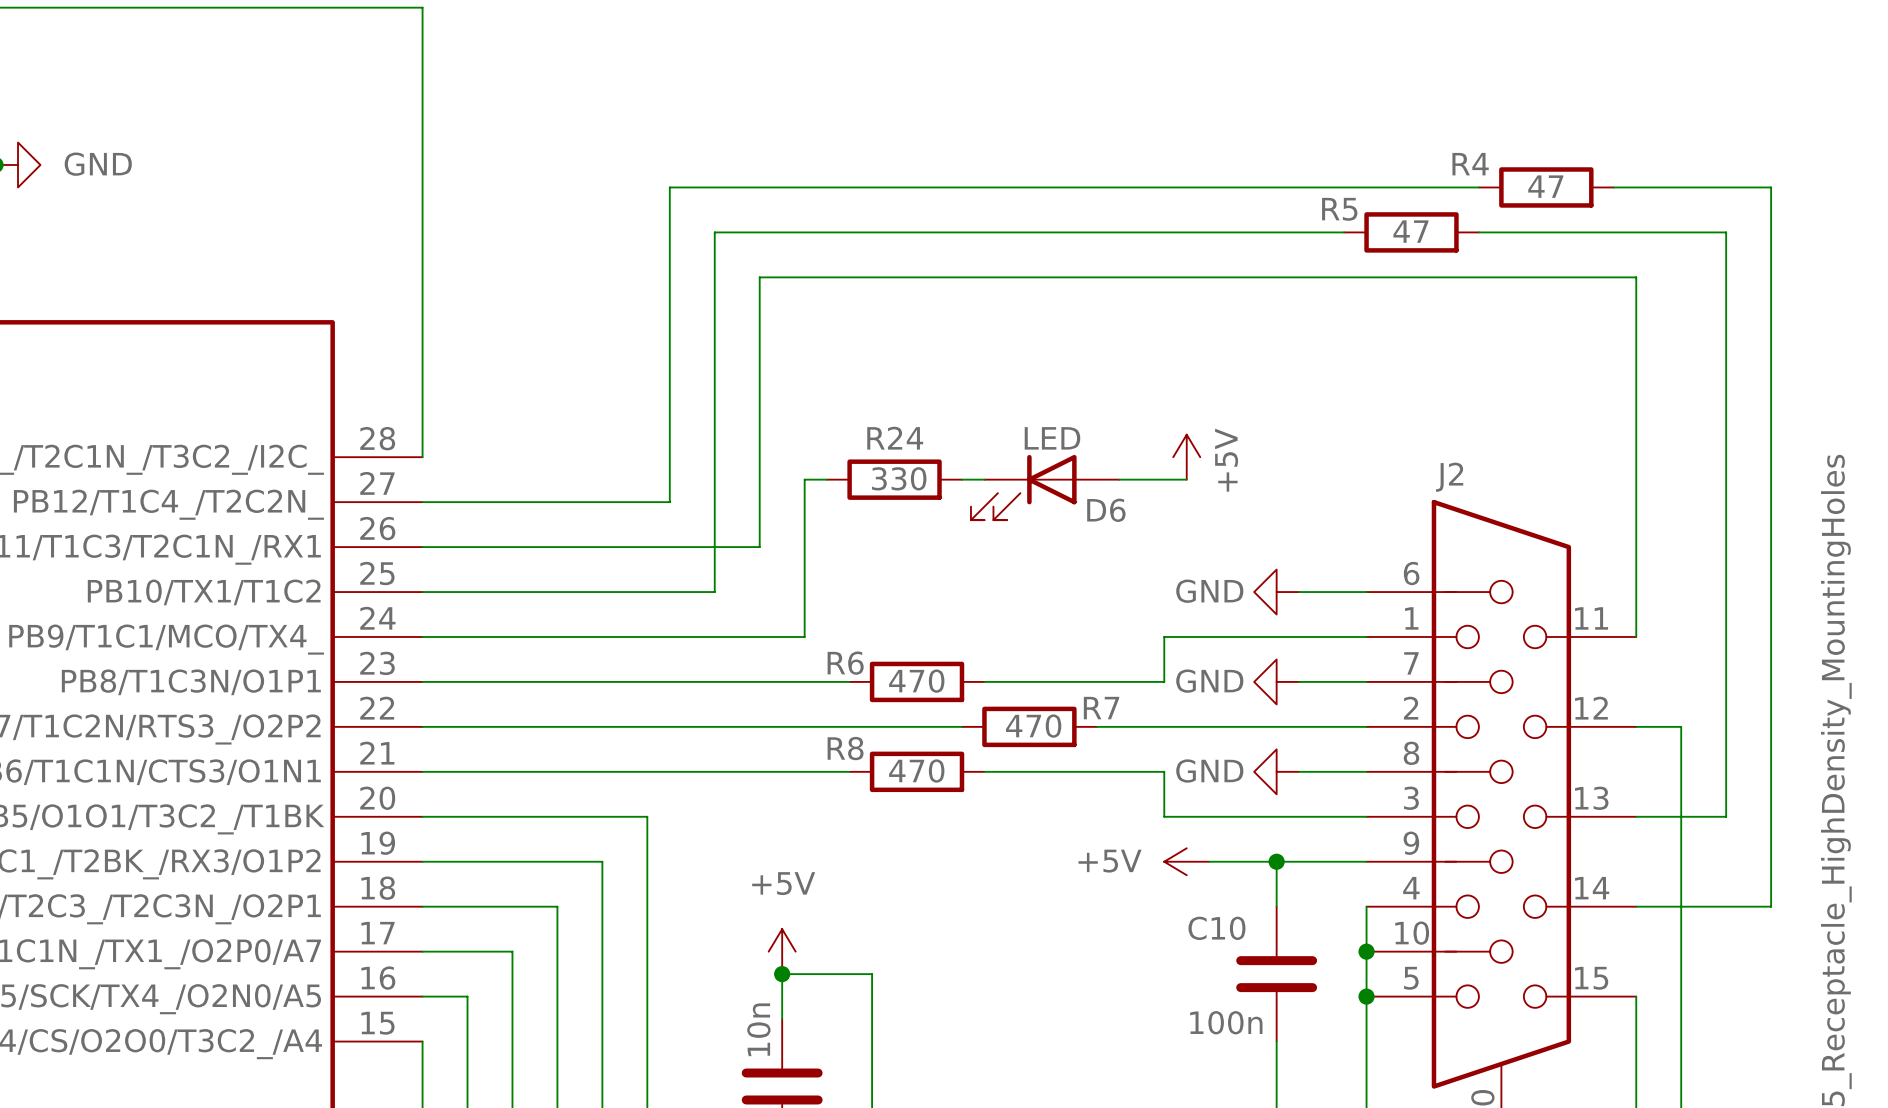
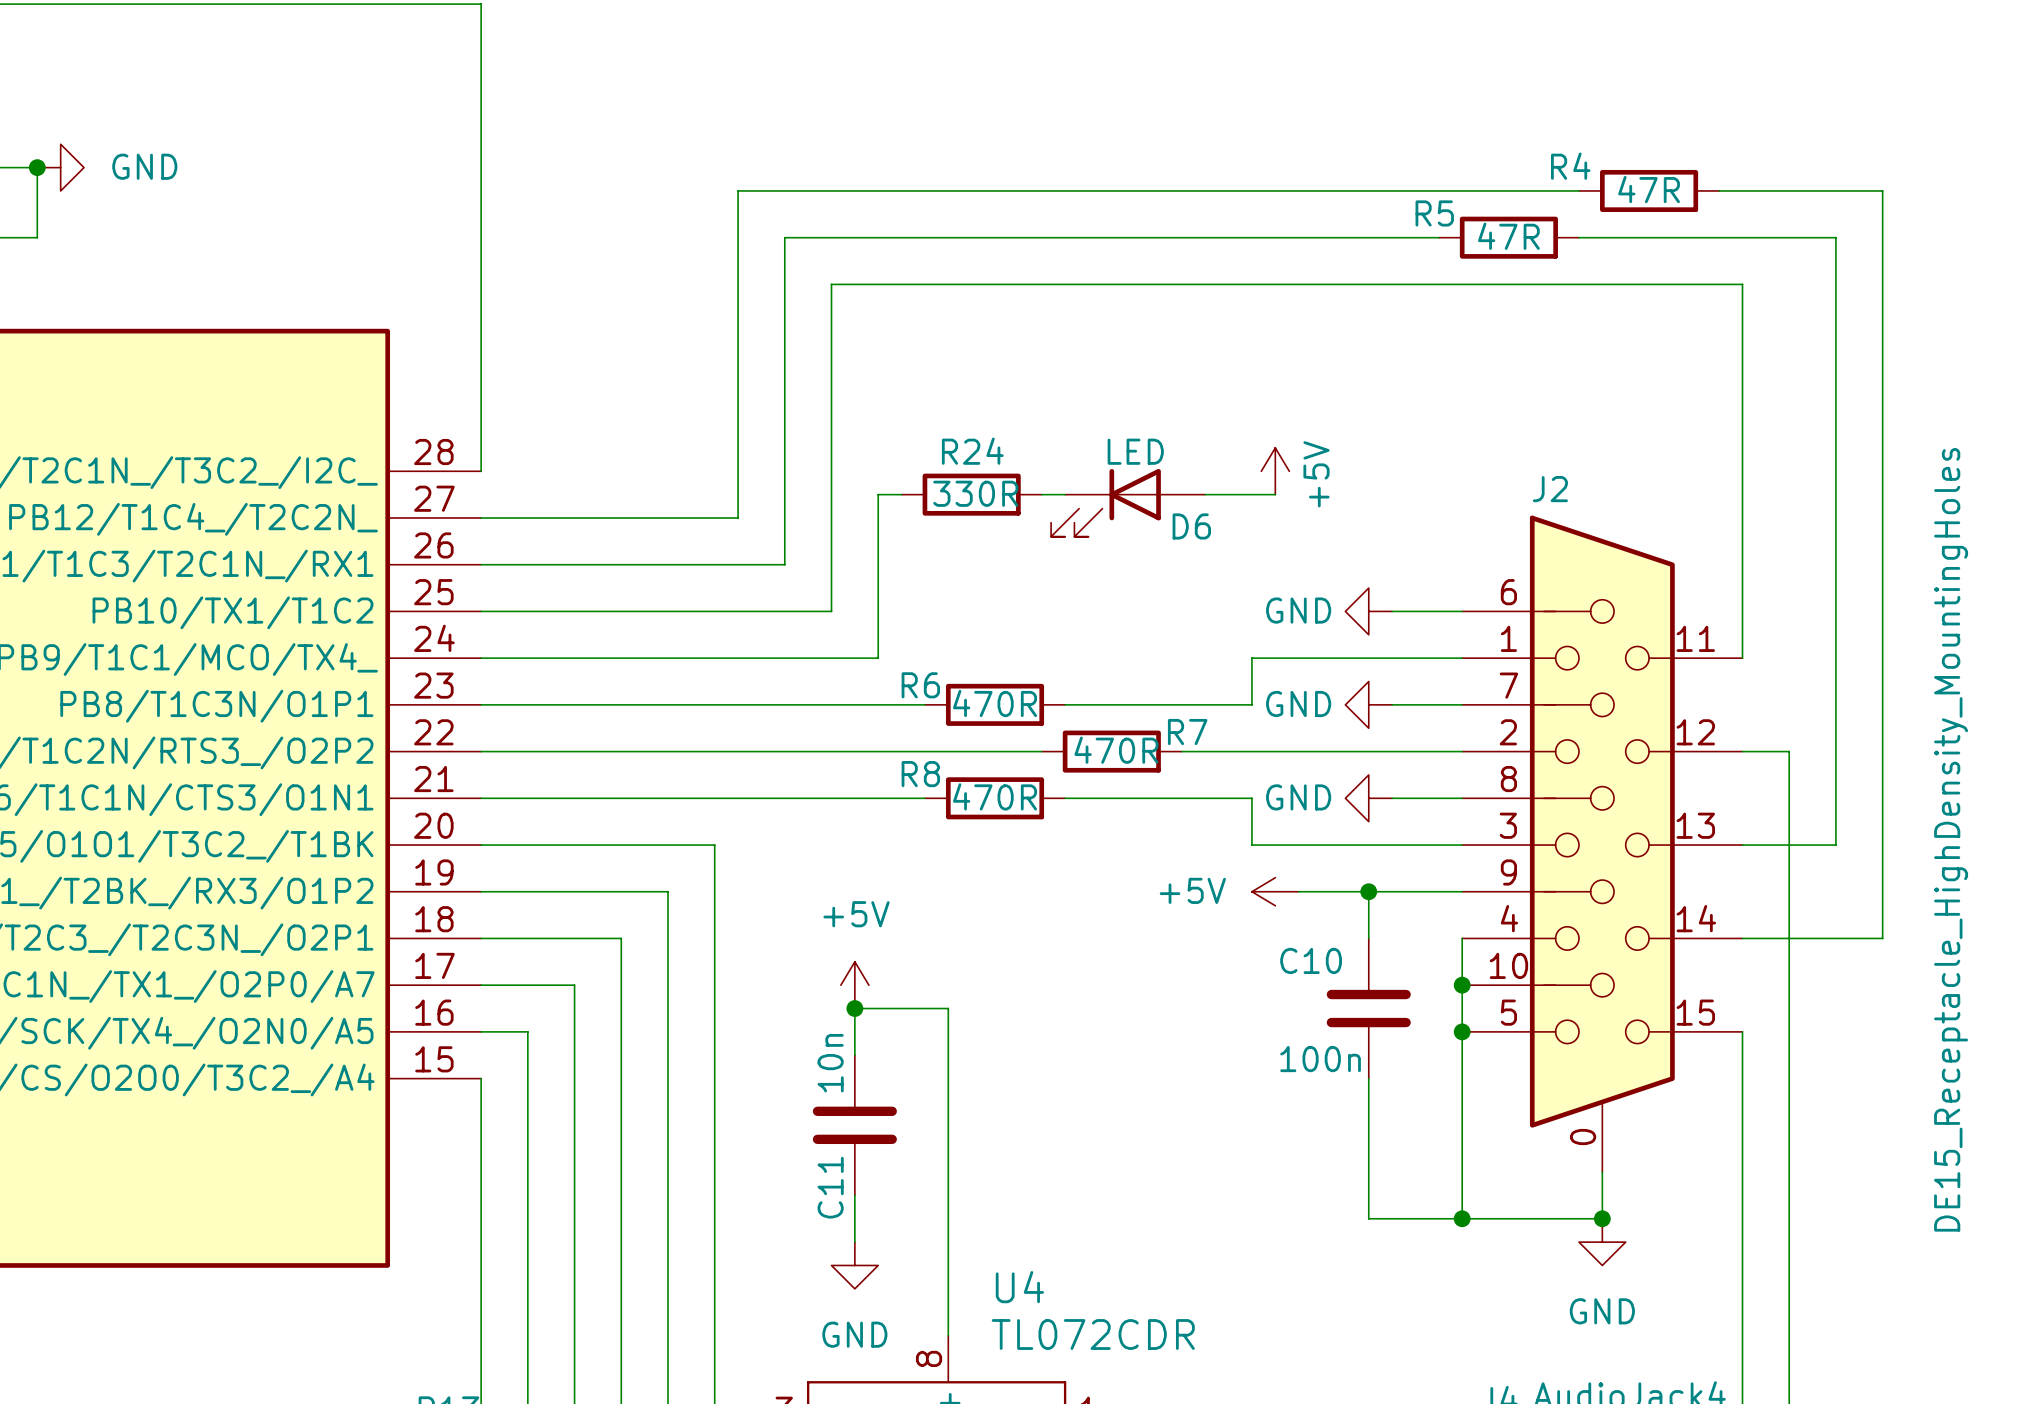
R4 value: 47 (1545, 186) -> 47R (1649, 189)
R5 value: 47 (1410, 231) -> 47R (1508, 236)
R24 value: 330 (899, 478) -> 330R (975, 493)
wire: (759, 547) (714, 547) (714, 592) -> (831, 564) (831, 611) (784, 611)
R6 value: 470 (916, 681) -> 470R (995, 703)
R7 value: 470 (1033, 726) -> 470R (1116, 750)
R8 value: 470 (916, 771) -> 470R (995, 796)

